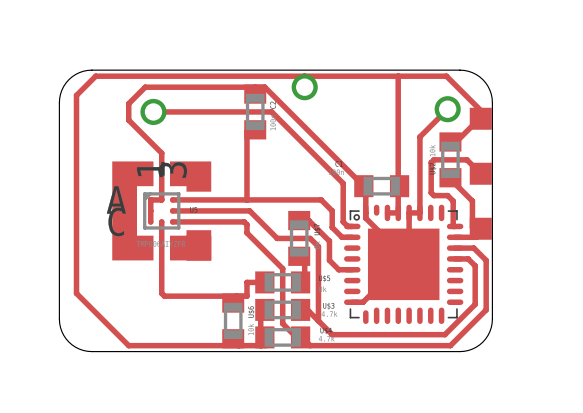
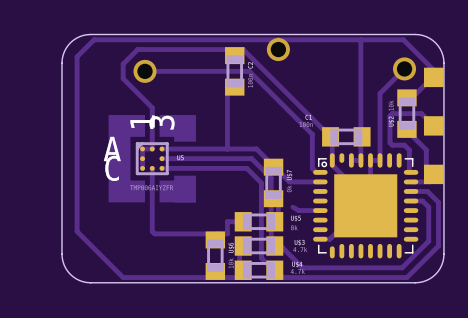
track: (279, 199) (321, 199) (332, 210) (332, 227) (342, 237) -> (256, 148) (289, 181) (311, 181)
track: (249, 210) (277, 238) (310, 238) (318, 246) (318, 320) -> (229, 158) (251, 158) (271, 178) (271, 236) (280, 246)
track: (299, 220) (308, 220) (329, 241) (329, 260) (338, 269) -> (292, 207) (298, 210) (308, 210)
track: (244, 221) (246, 224) (246, 232) (282, 268) (282, 323) (296, 337) (299, 337) -> (225, 168) (246, 168) (261, 182) (261, 258) (273, 270)

